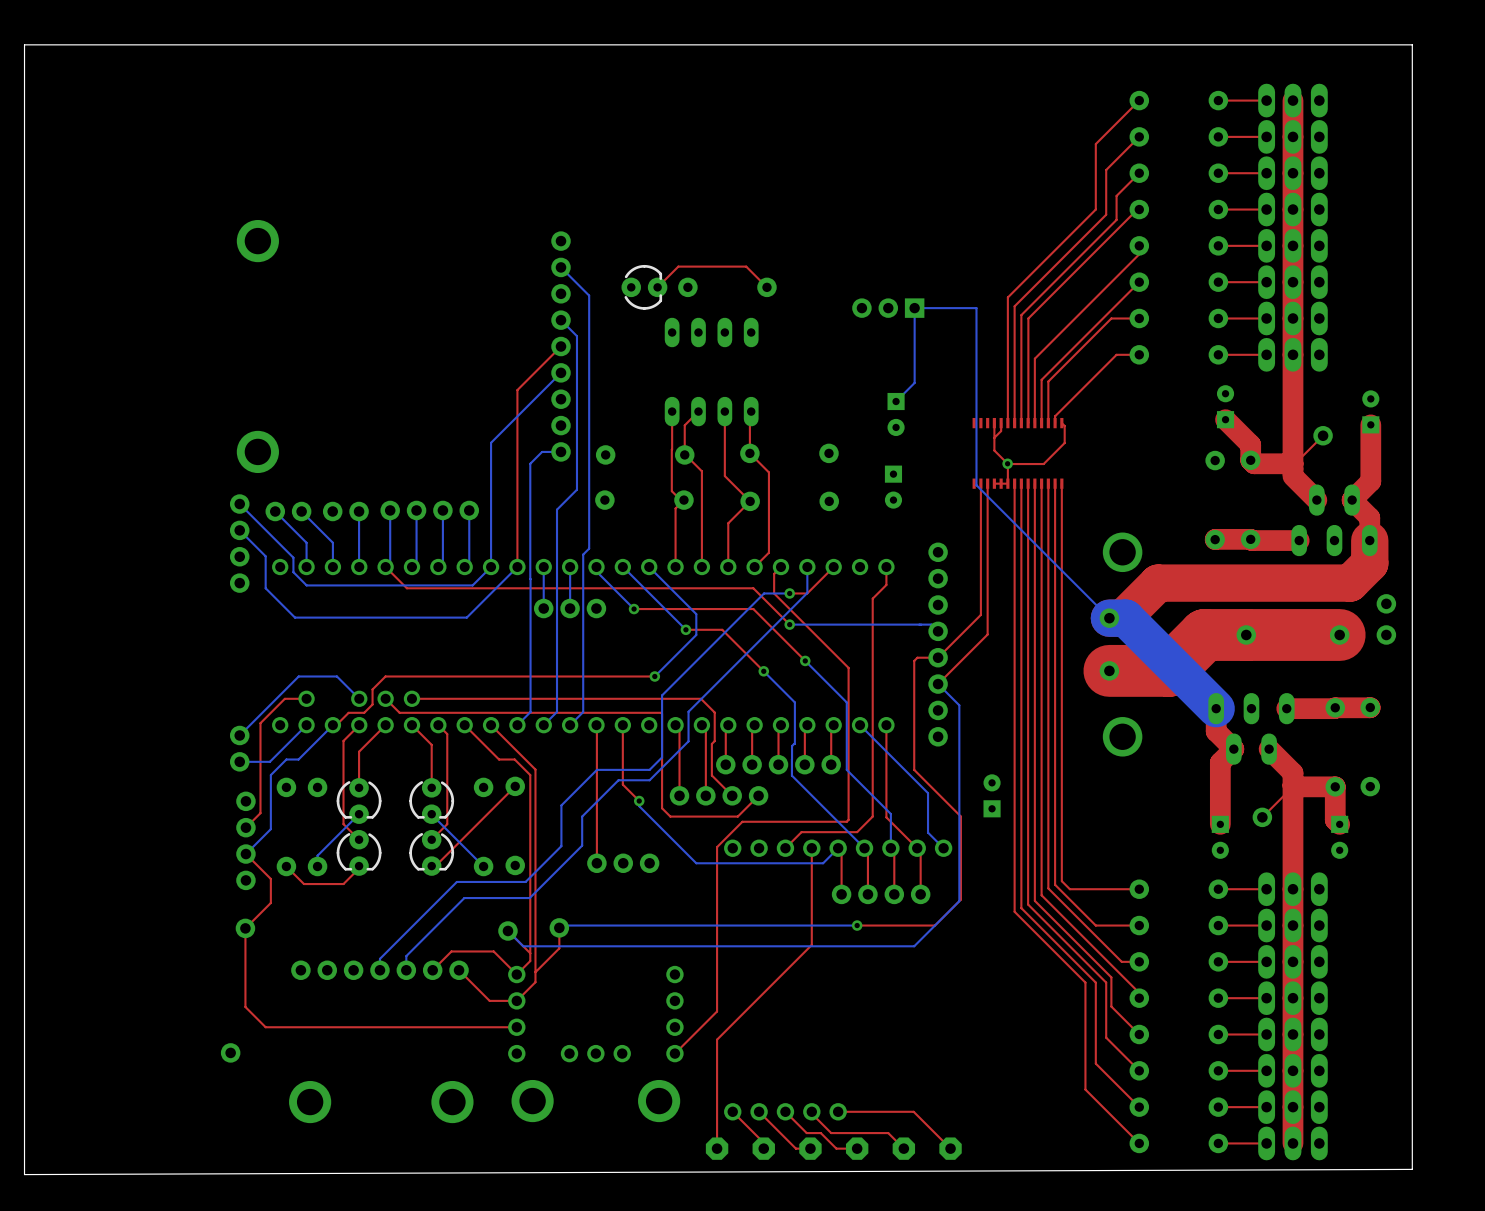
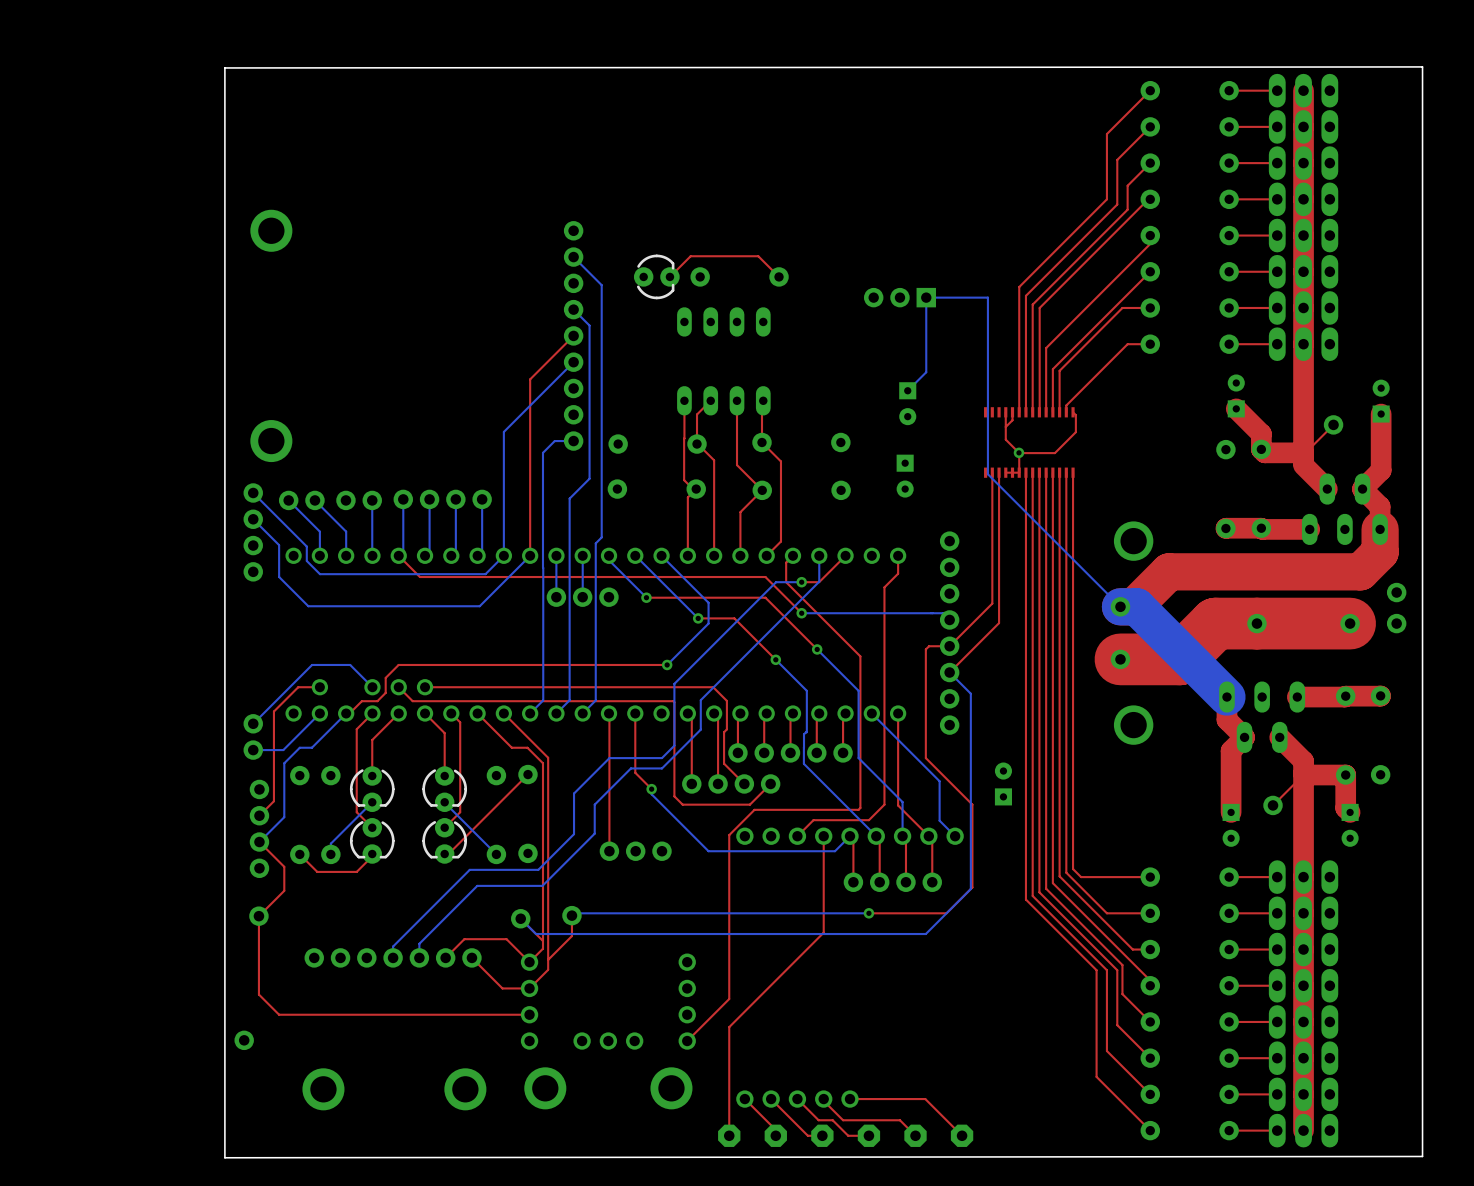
board edge: (1412, 76) (1412, 44) (24, 44) (24, 1174) (1412, 1169) -> (1422, 66) (224, 67) (224, 1157) (1422, 1156)

